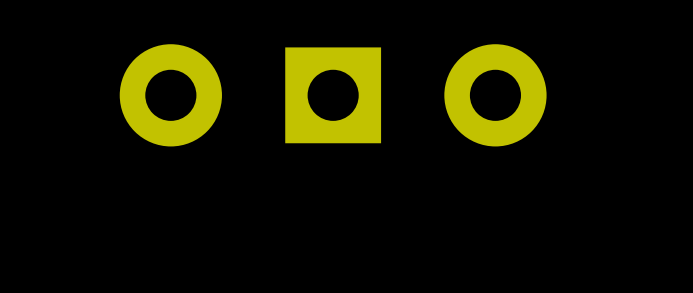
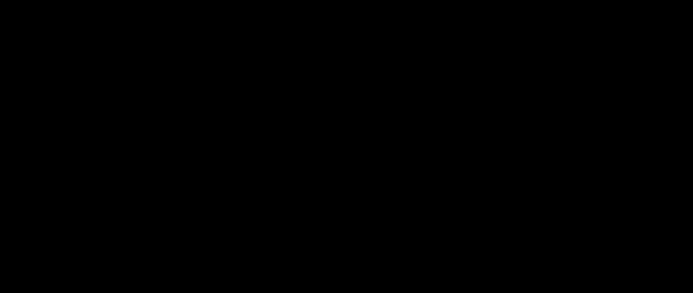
part: (333, 95) -> none

